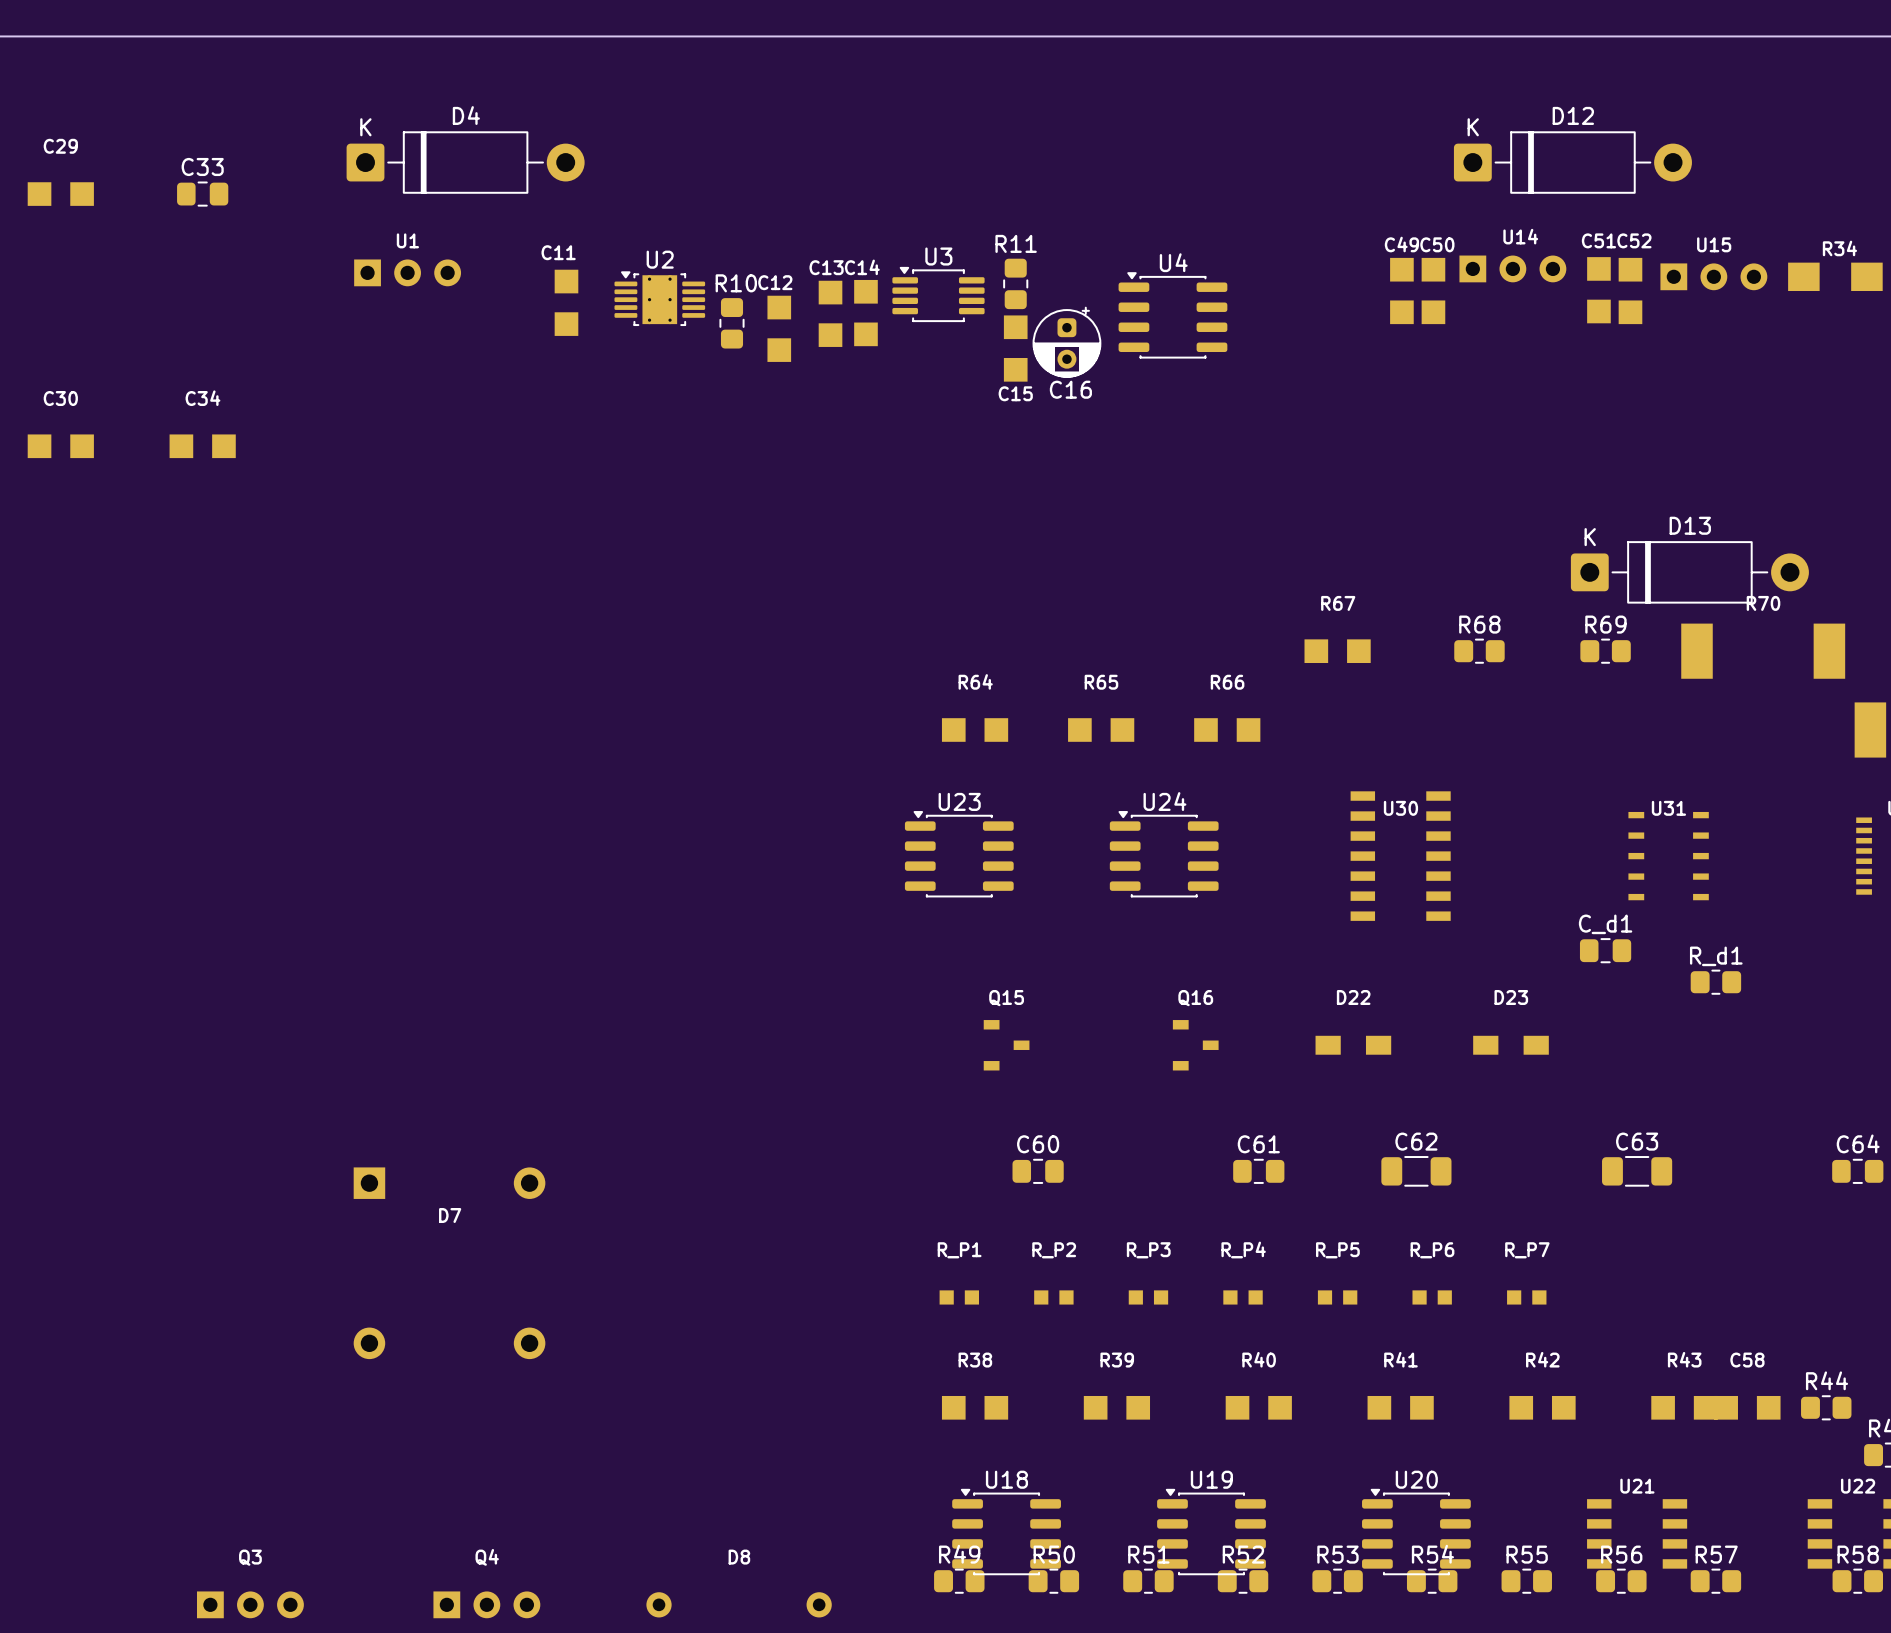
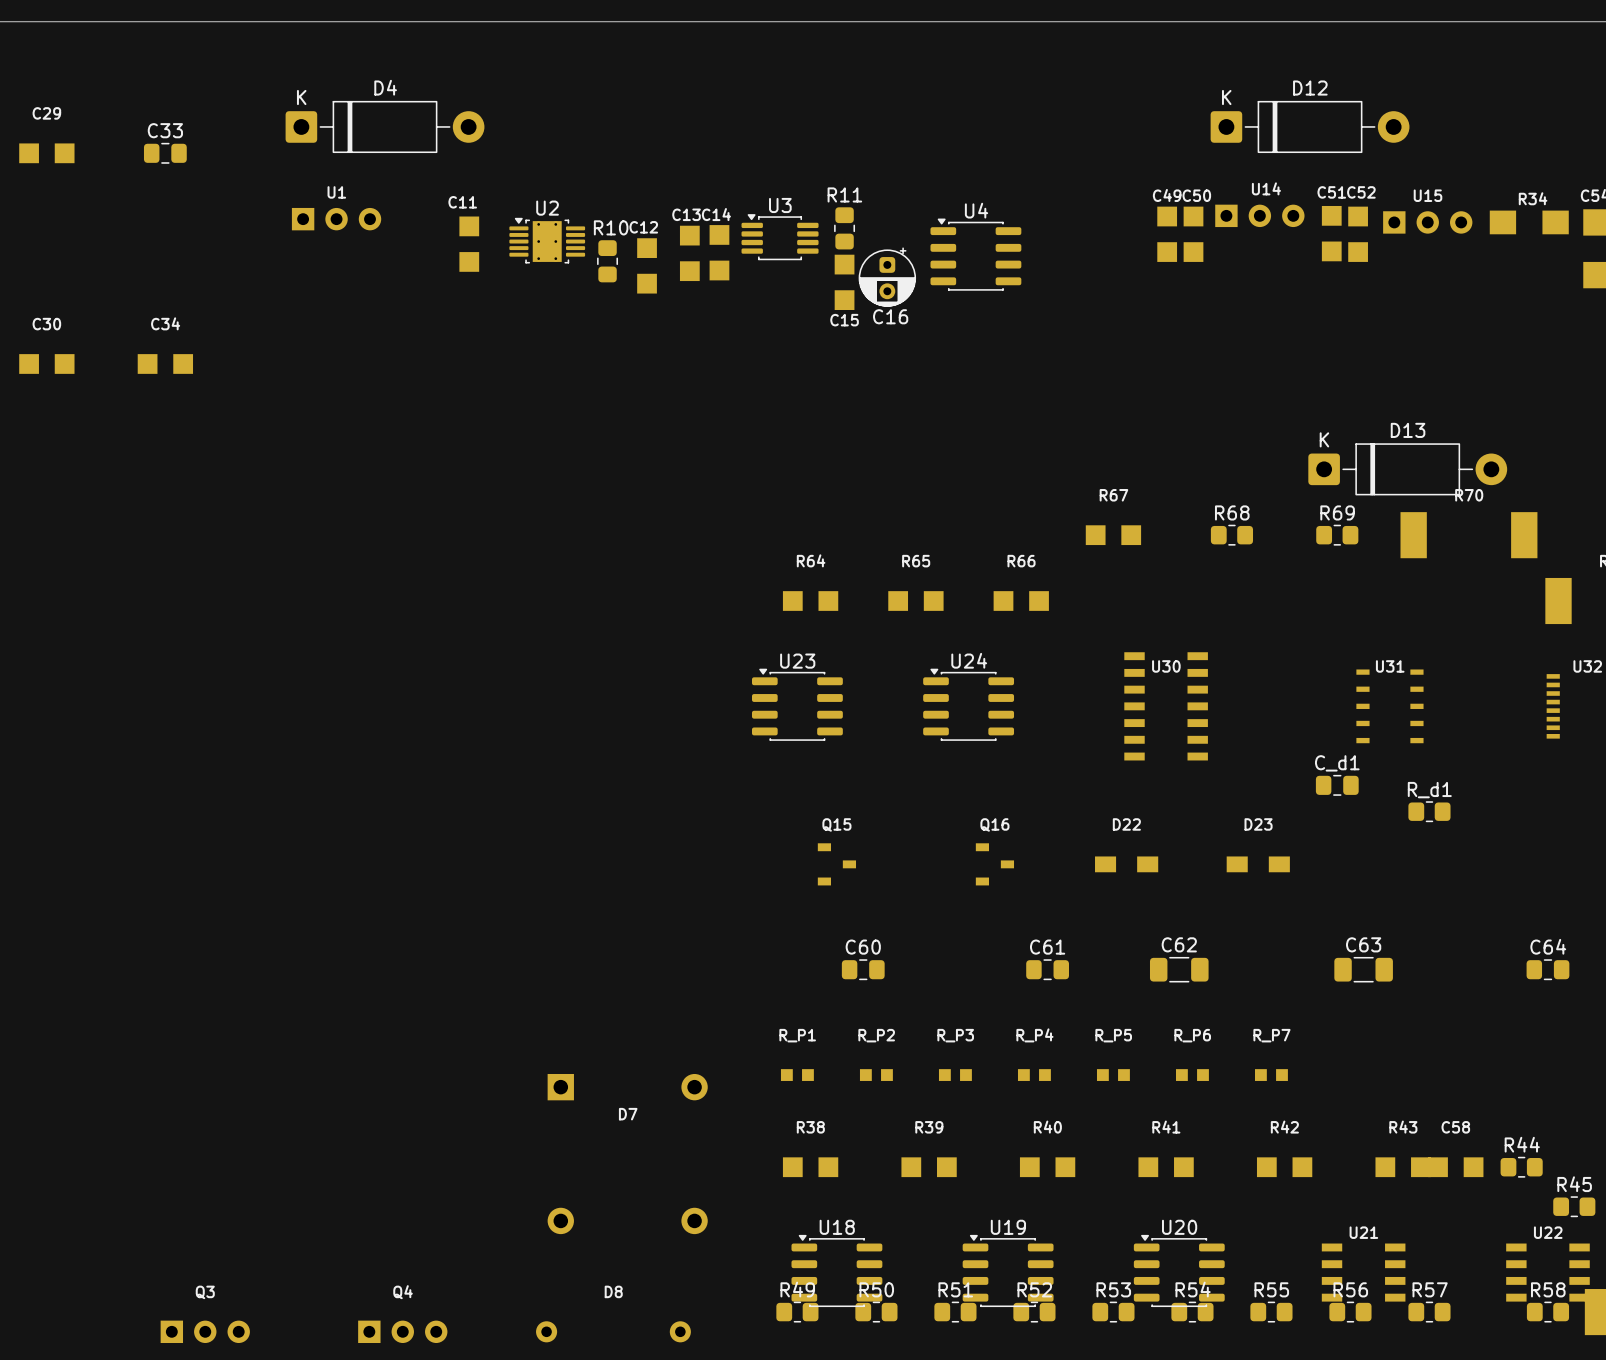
D7 position: (449, 1263) -> (627, 1154)

